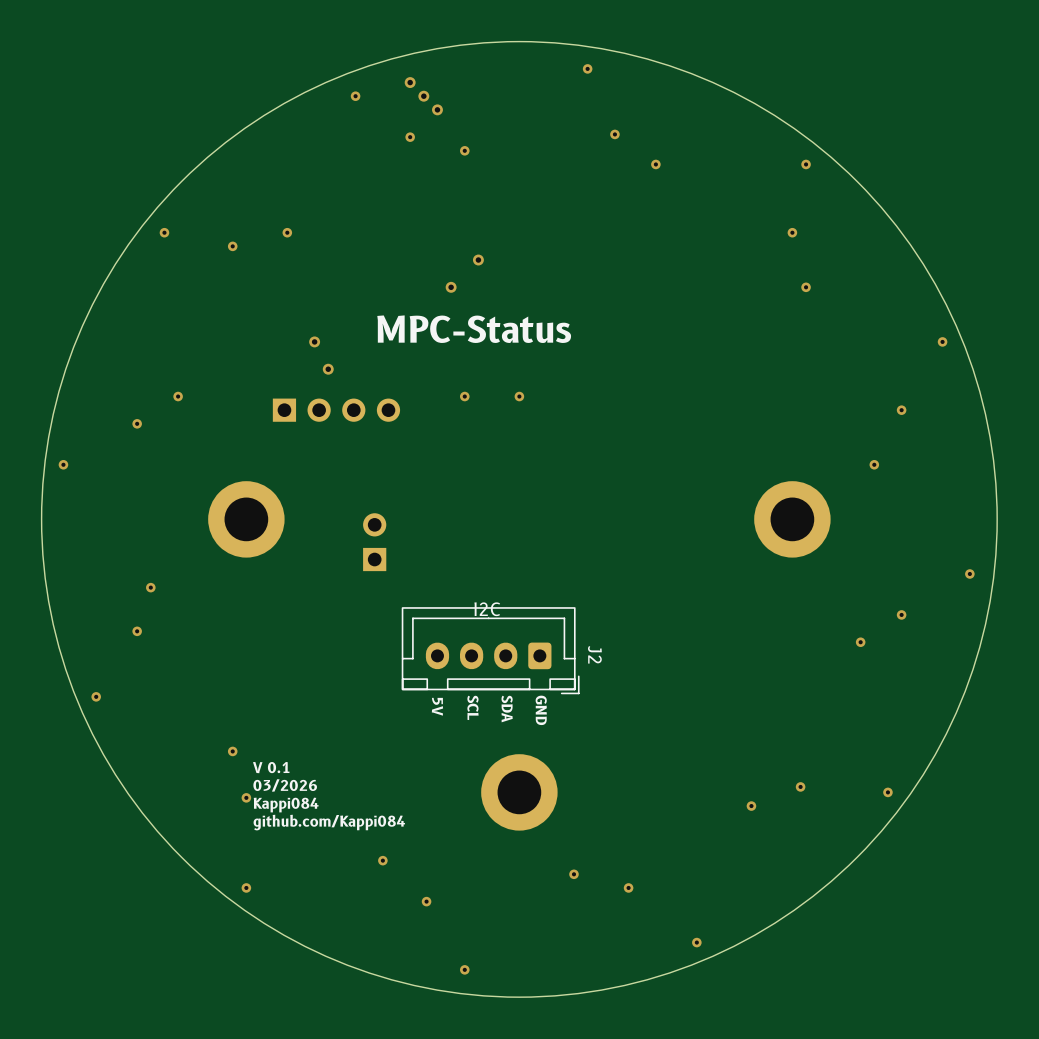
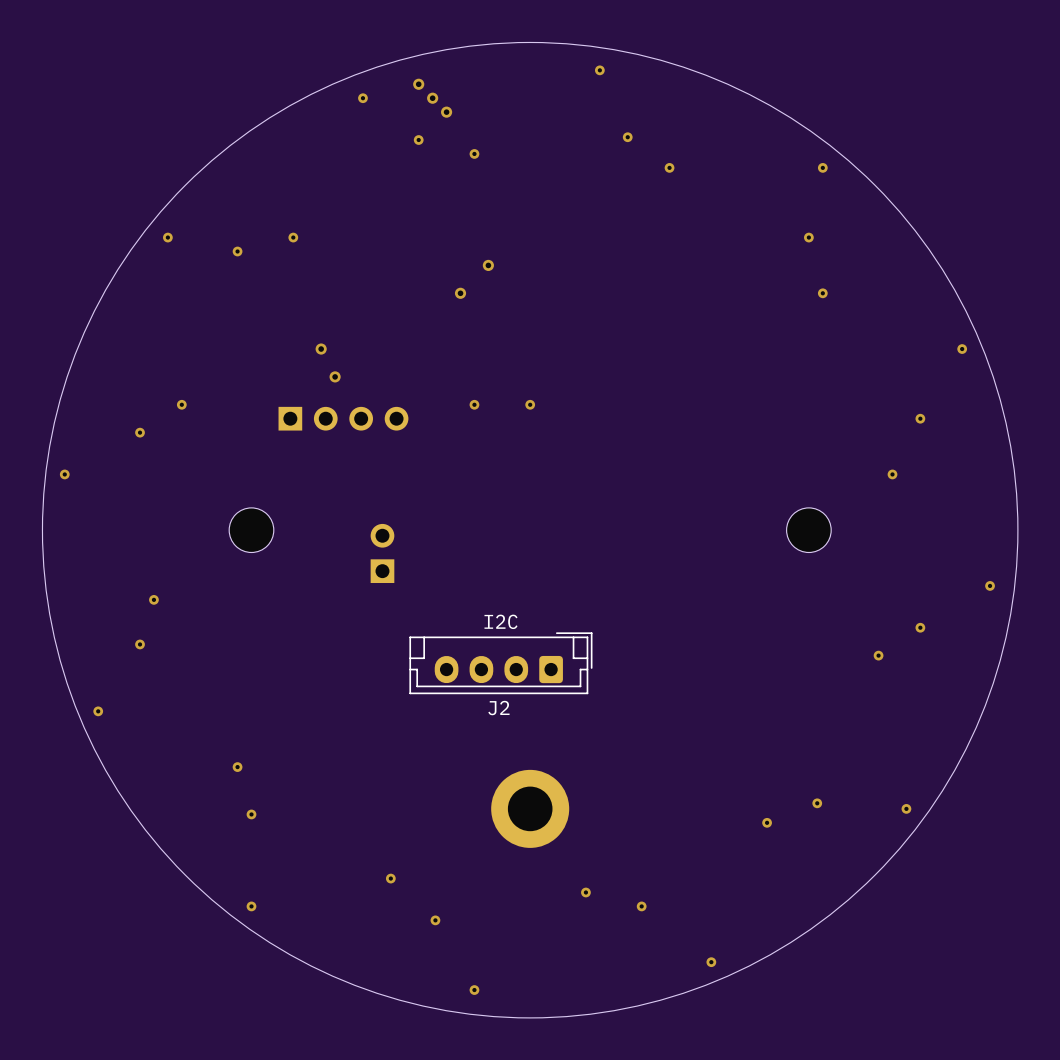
text: MPC-Status (474, 329) -> none
part footprint: [208, 481, 285, 558] -> [229, 507, 274, 553]
part footprint: [754, 481, 831, 558] -> [786, 507, 832, 553]
J2 footprint: [401, 607, 580, 695] -> [409, 632, 593, 695]
J2 name position: J2 (594, 654) -> J2 (498, 708)
text: 5V (437, 706) -> none
text: SCL (472, 707) -> none
text: SDA (507, 709) -> none
text: GND (541, 710) -> none
text: V 0.1 (271, 767) -> none
text: 03/2026 (285, 785) -> none
text: Kappi084 (286, 805) -> none
text: github.com/Kappi084 (329, 822) -> none

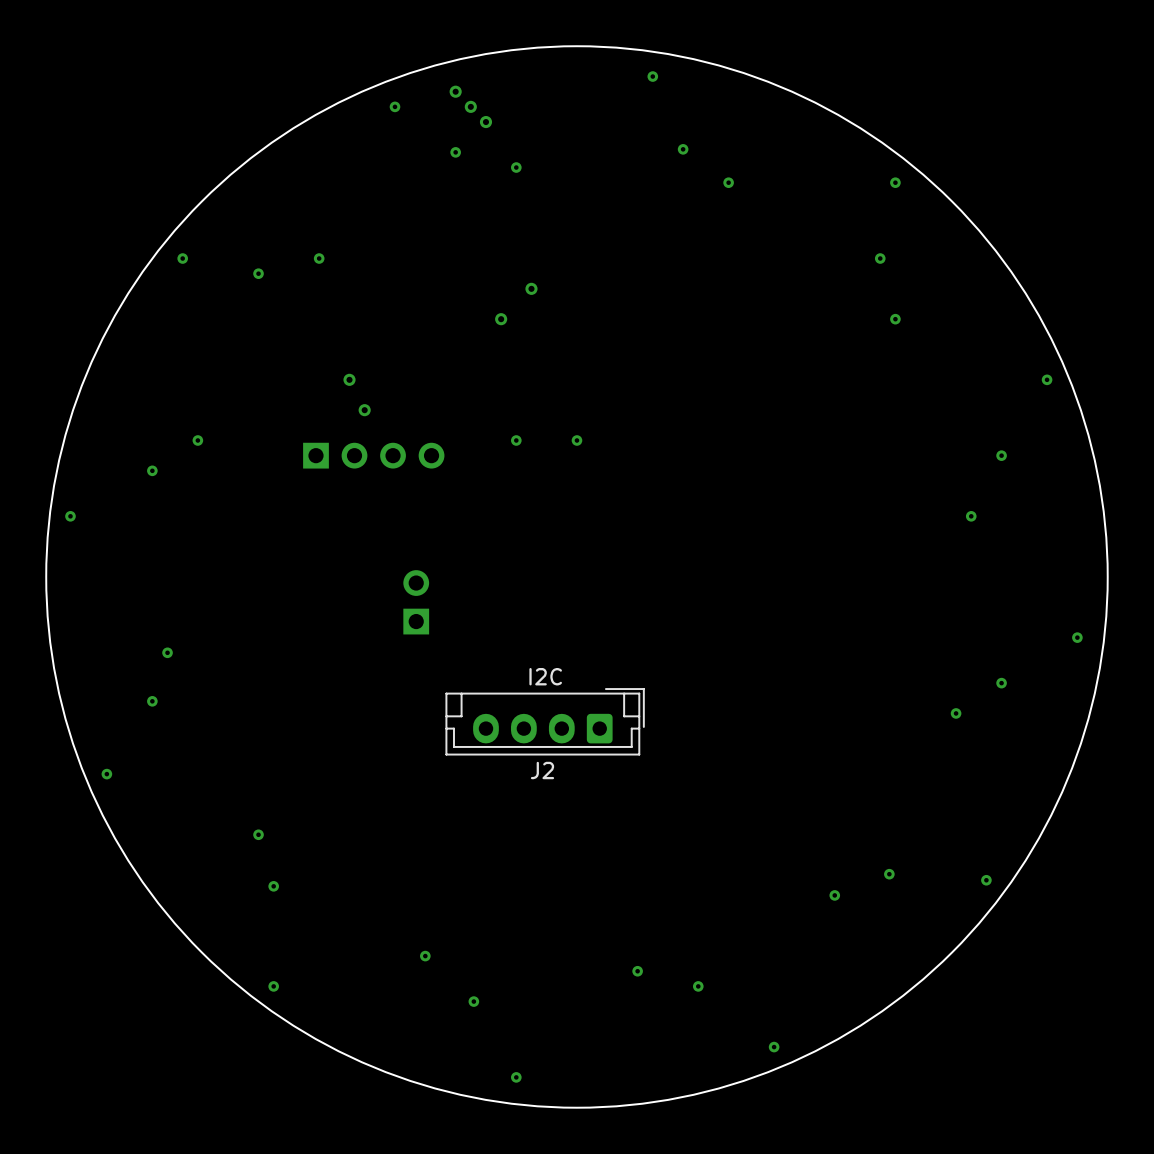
part: (251, 530) -> none
part: (808, 530) -> none
part: (530, 808) -> none

